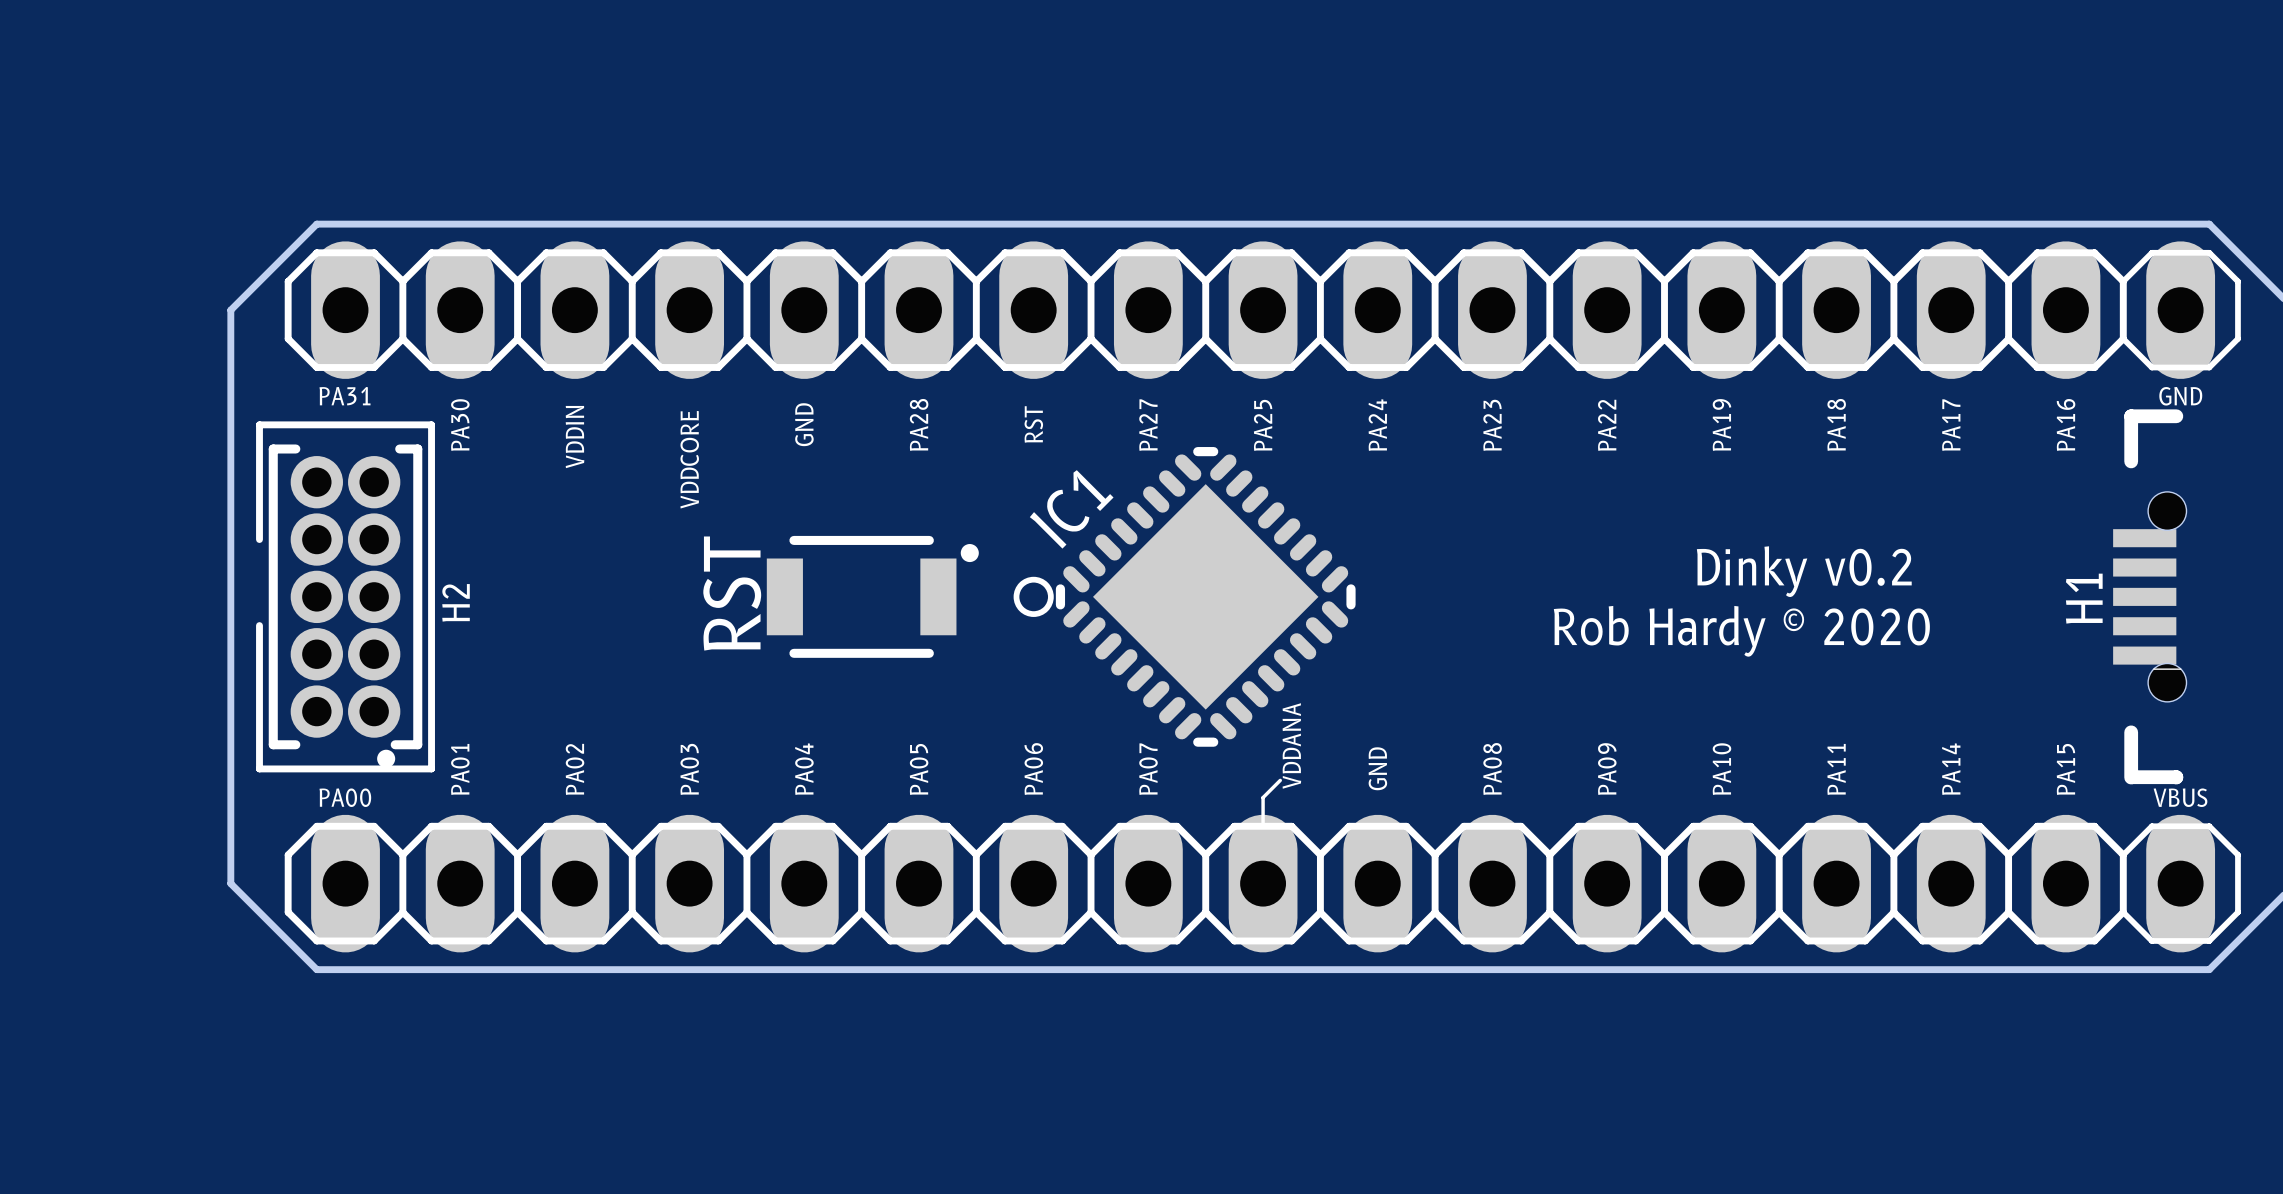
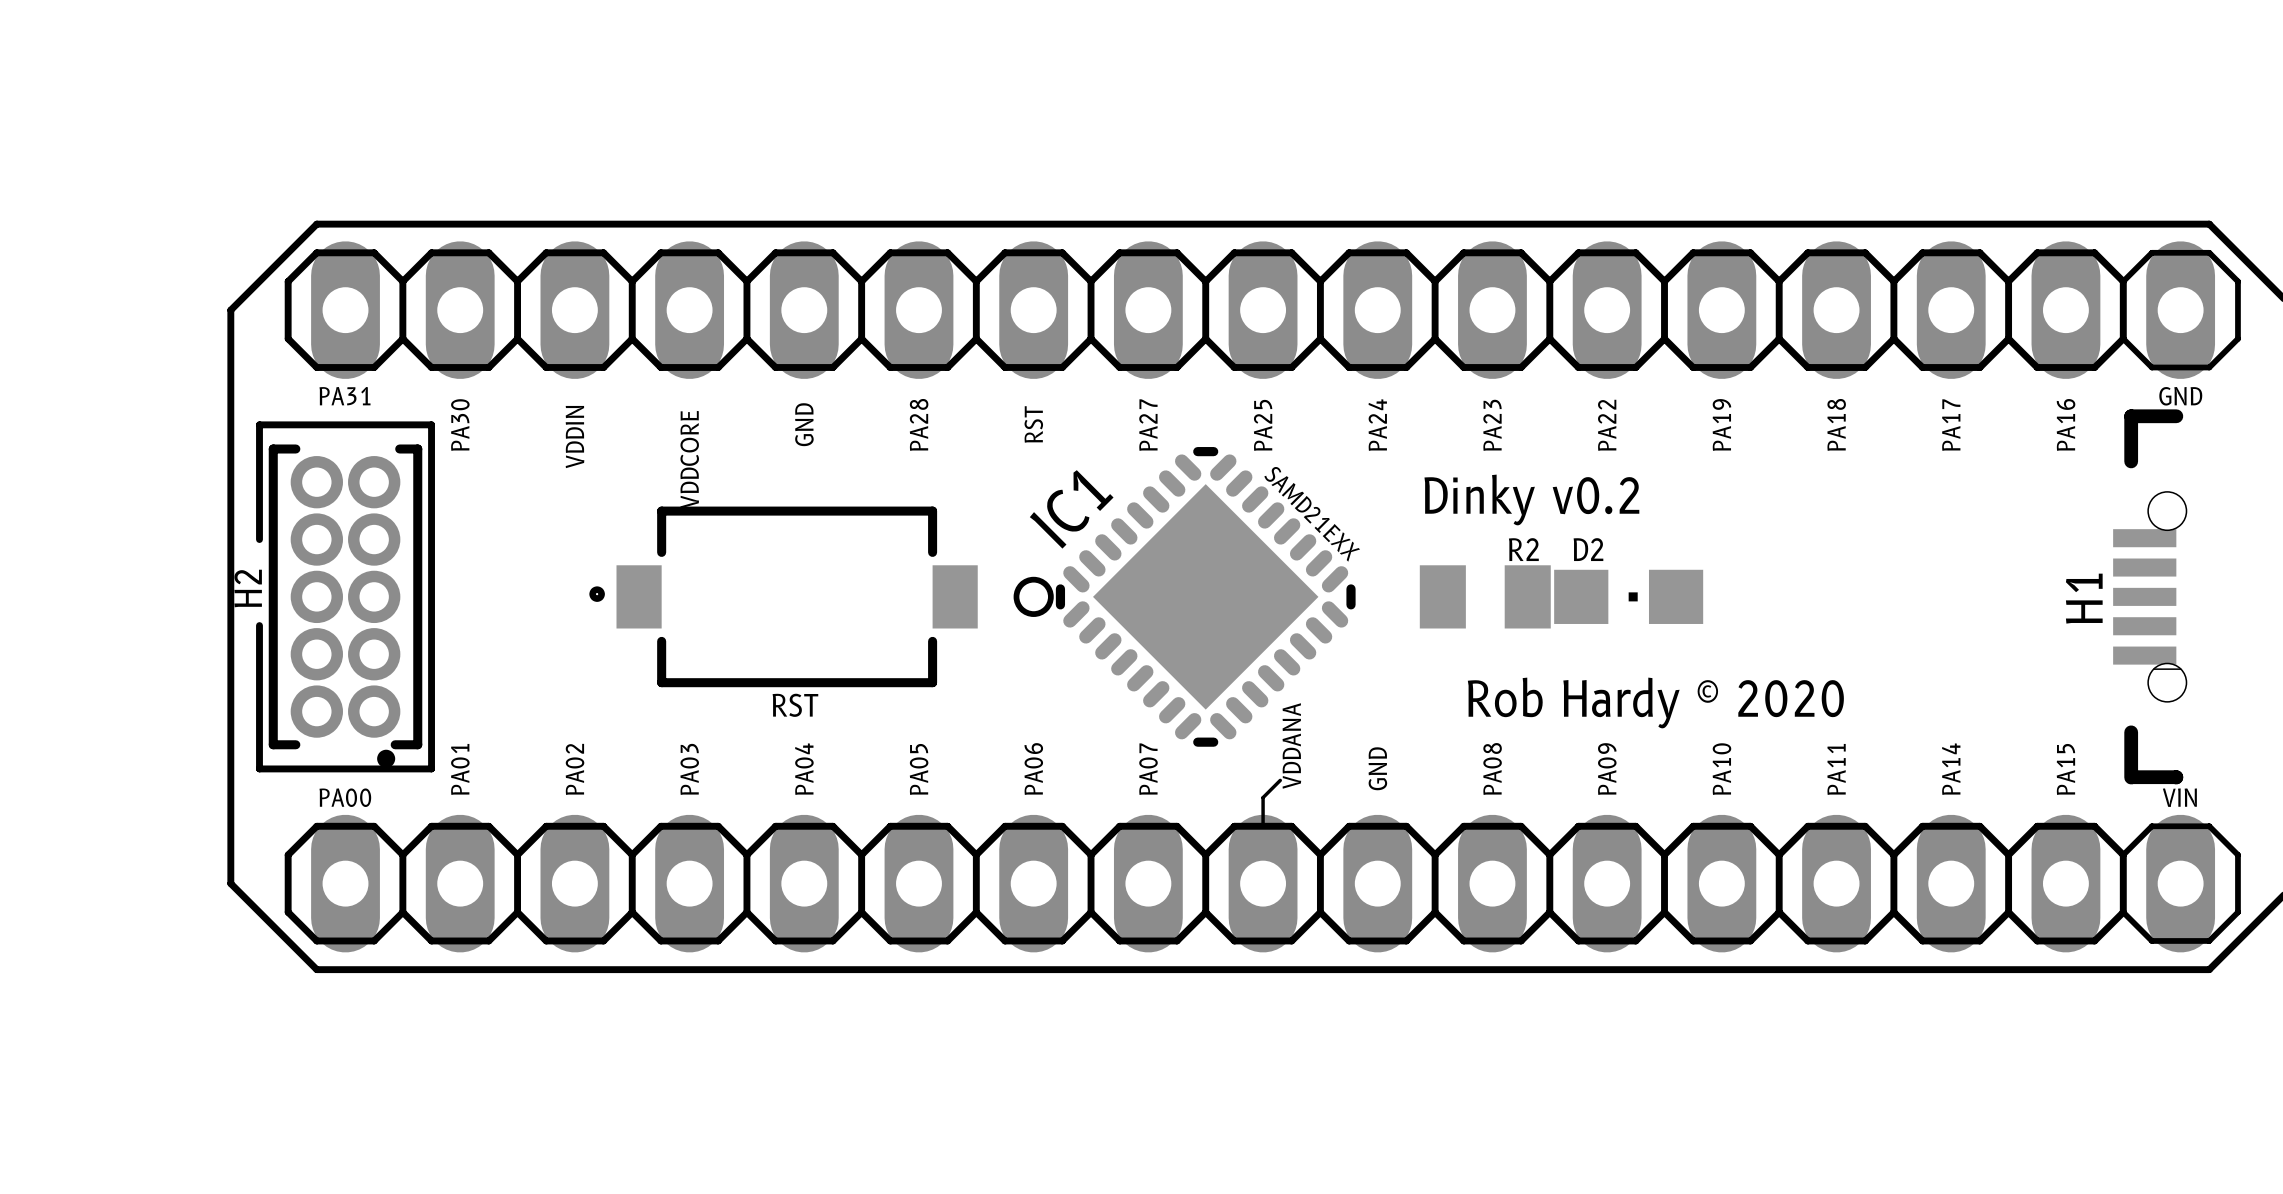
text: none -> SAMD21EXX (1312, 514)
text position: Dinky v0.2 (1804, 571) -> Dinky v0.2 (1531, 499)
RST: none -> (783, 596)
RST: (872, 596) -> none
R2: none -> (1485, 596)
D2: none -> (1628, 596)
H2 name position: H2 (456, 602) -> H2 (248, 588)
text position: Rob Hardy © 2020 (1741, 631) -> Rob Hardy © 2020 (1655, 702)
text: VBUS (2180, 797) -> VIN (2179, 797)

